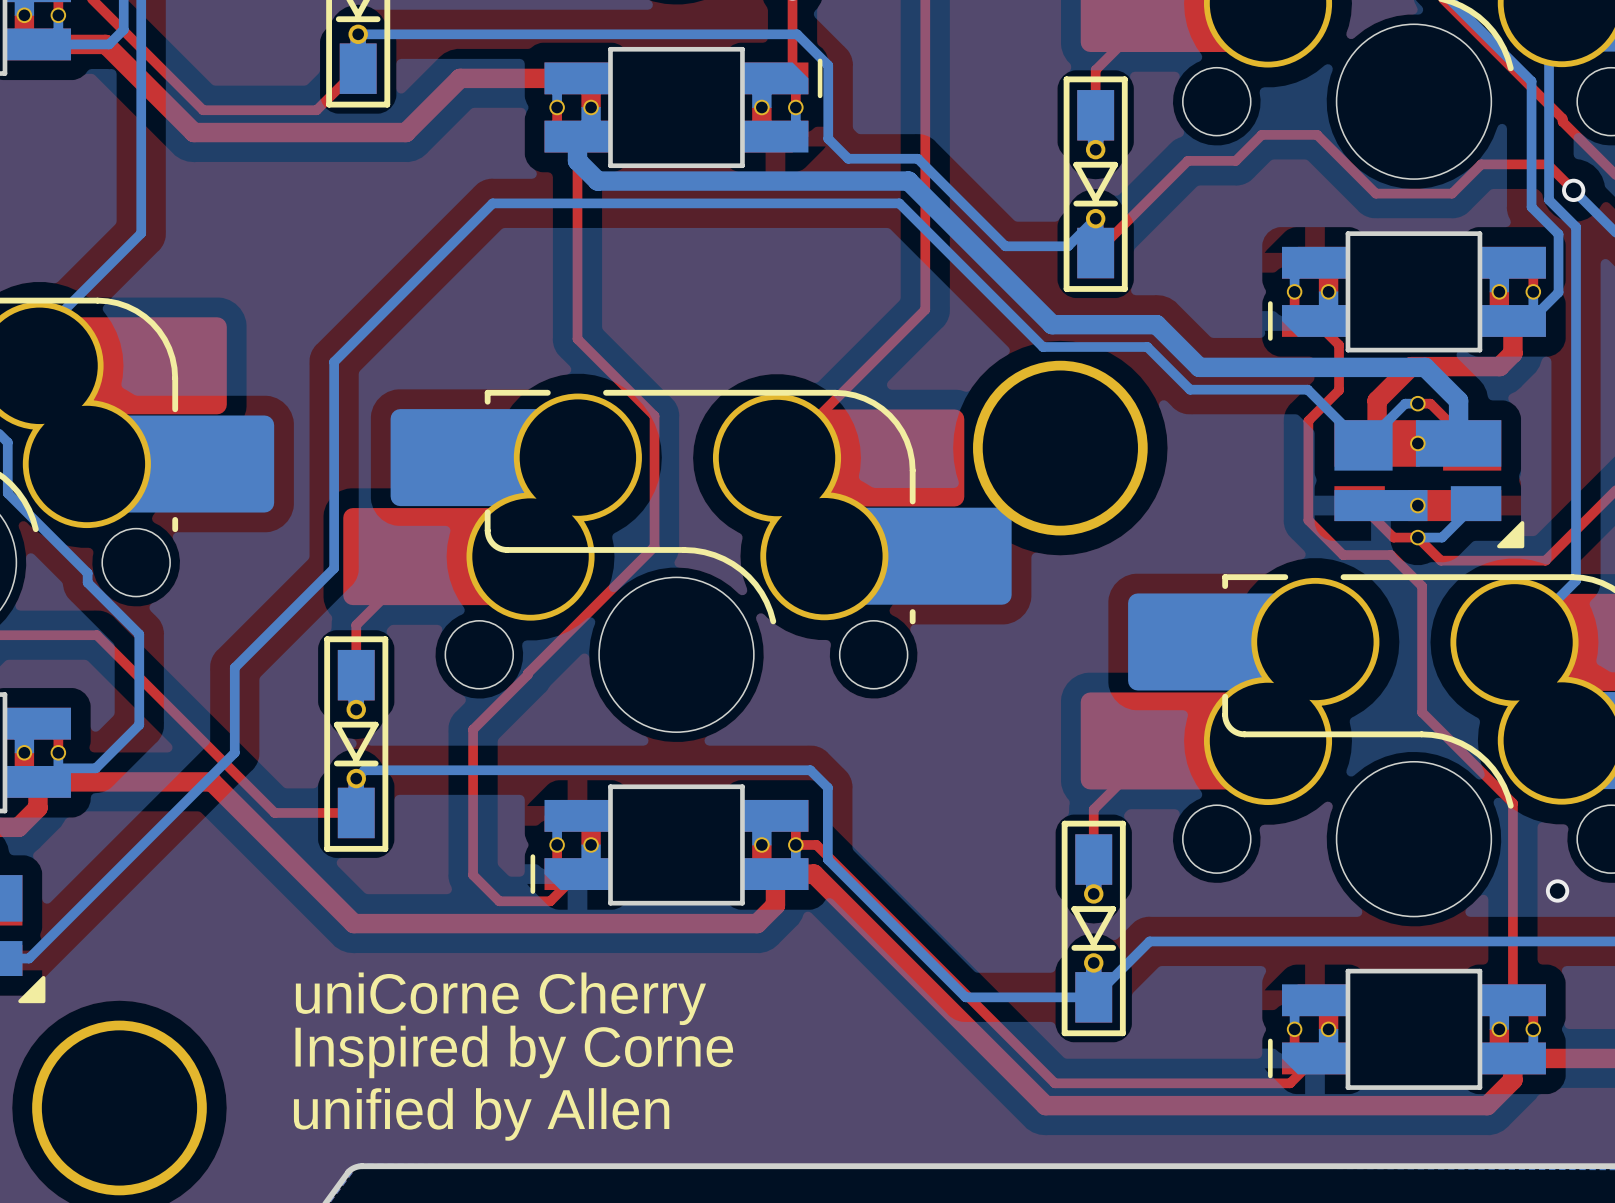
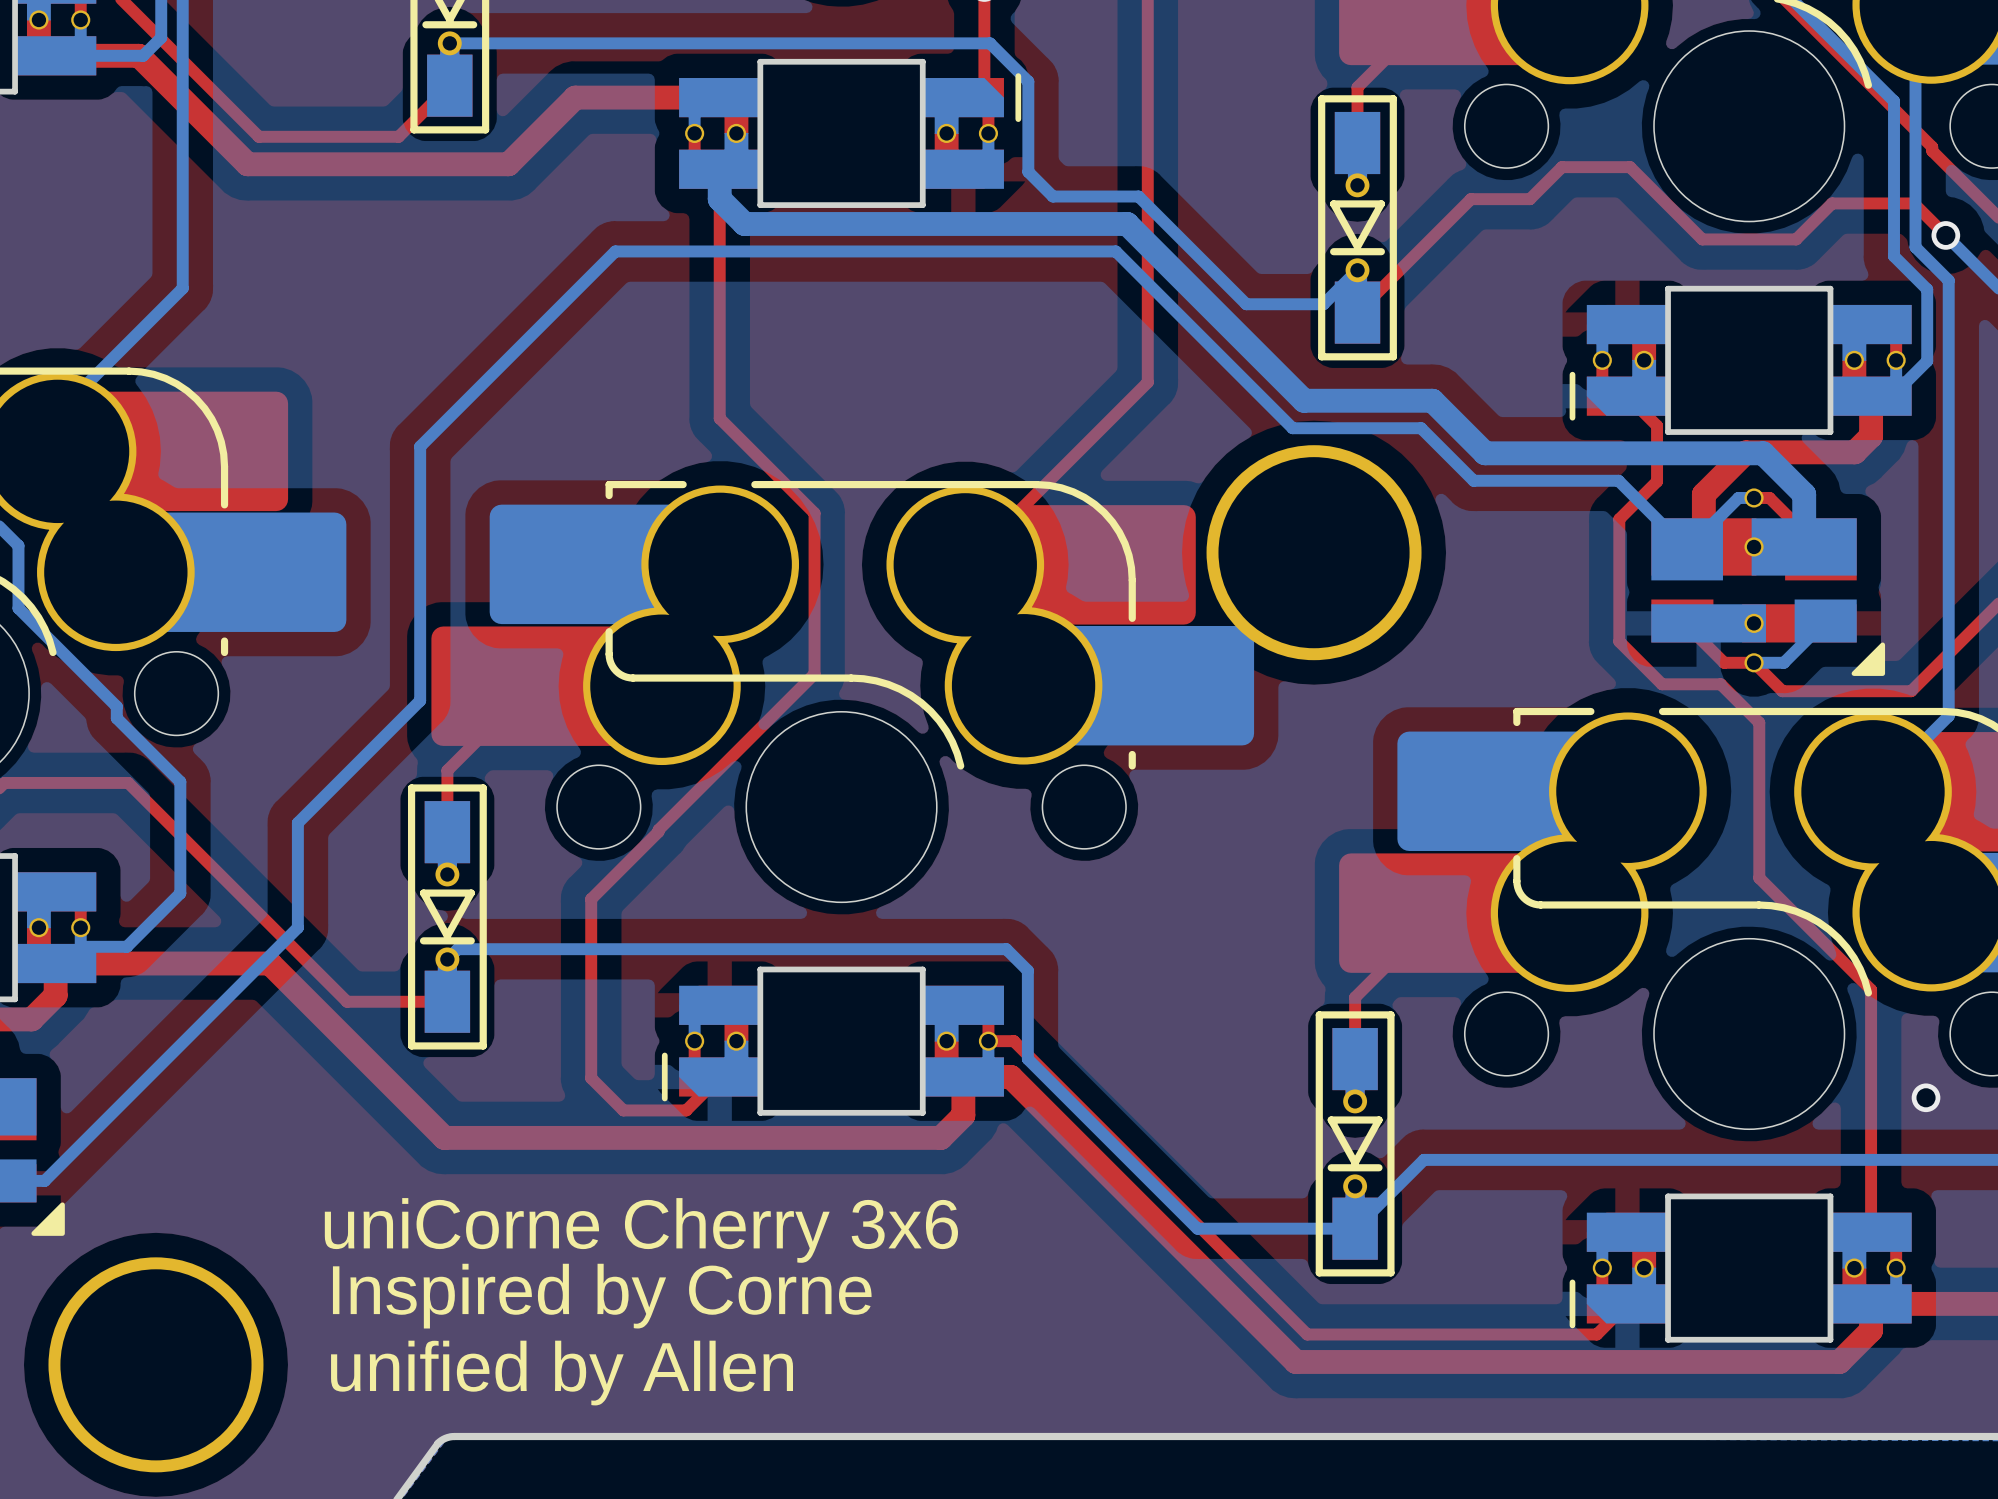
text: uniCorne Cherry (500, 998) -> uniCorne Cherry 3x6 (641, 1230)
text position: Inspired by Corne (514, 1051) -> Inspired by Corne (602, 1296)
text position: unified by Allen (481, 1114) -> unified by Allen (562, 1373)

